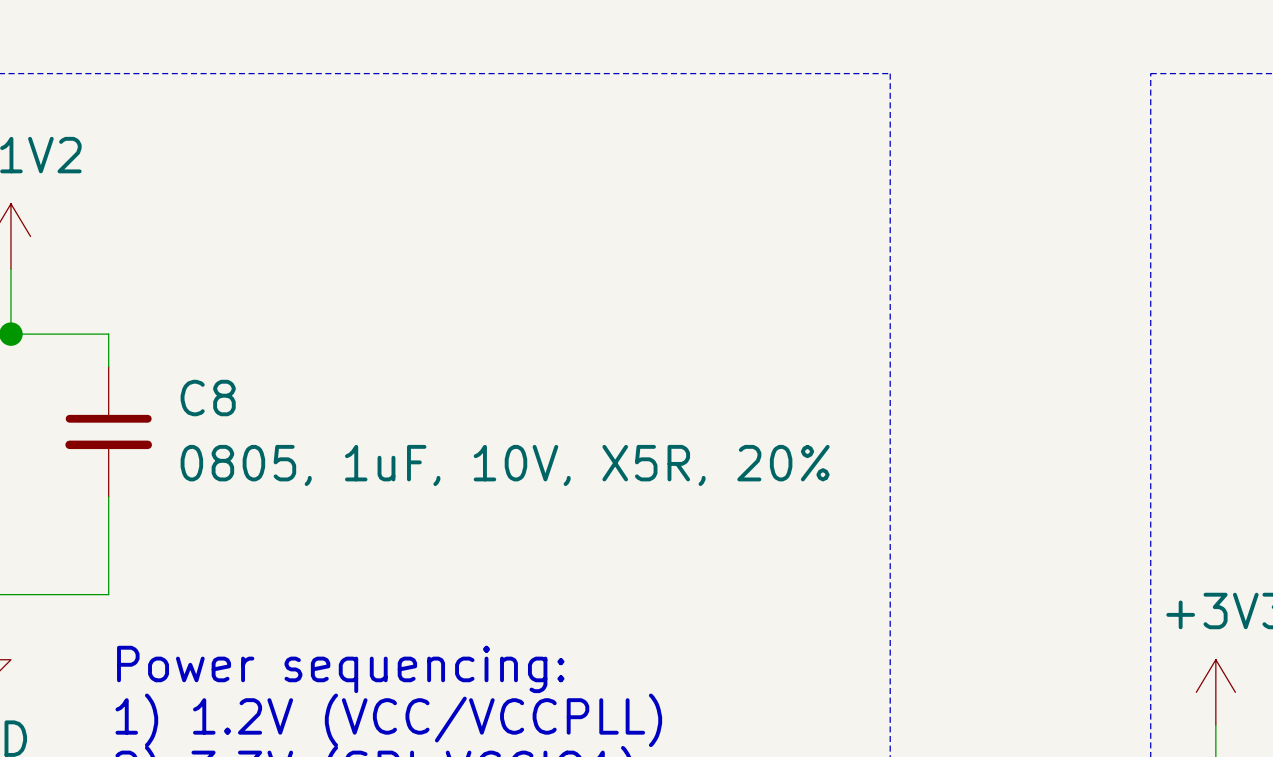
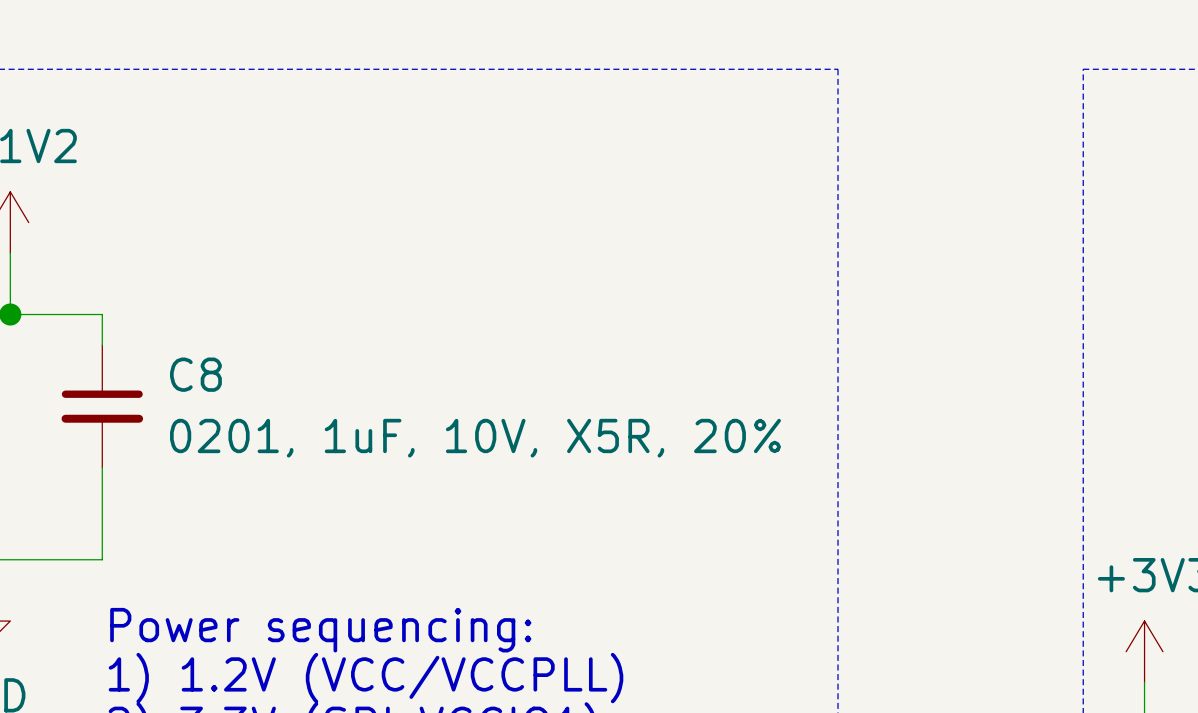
C8 value: 0805, 1uF, 10V, X5R, 20% (505, 465) -> 0201, 1uF, 10V, X5R, 20% (475, 438)

